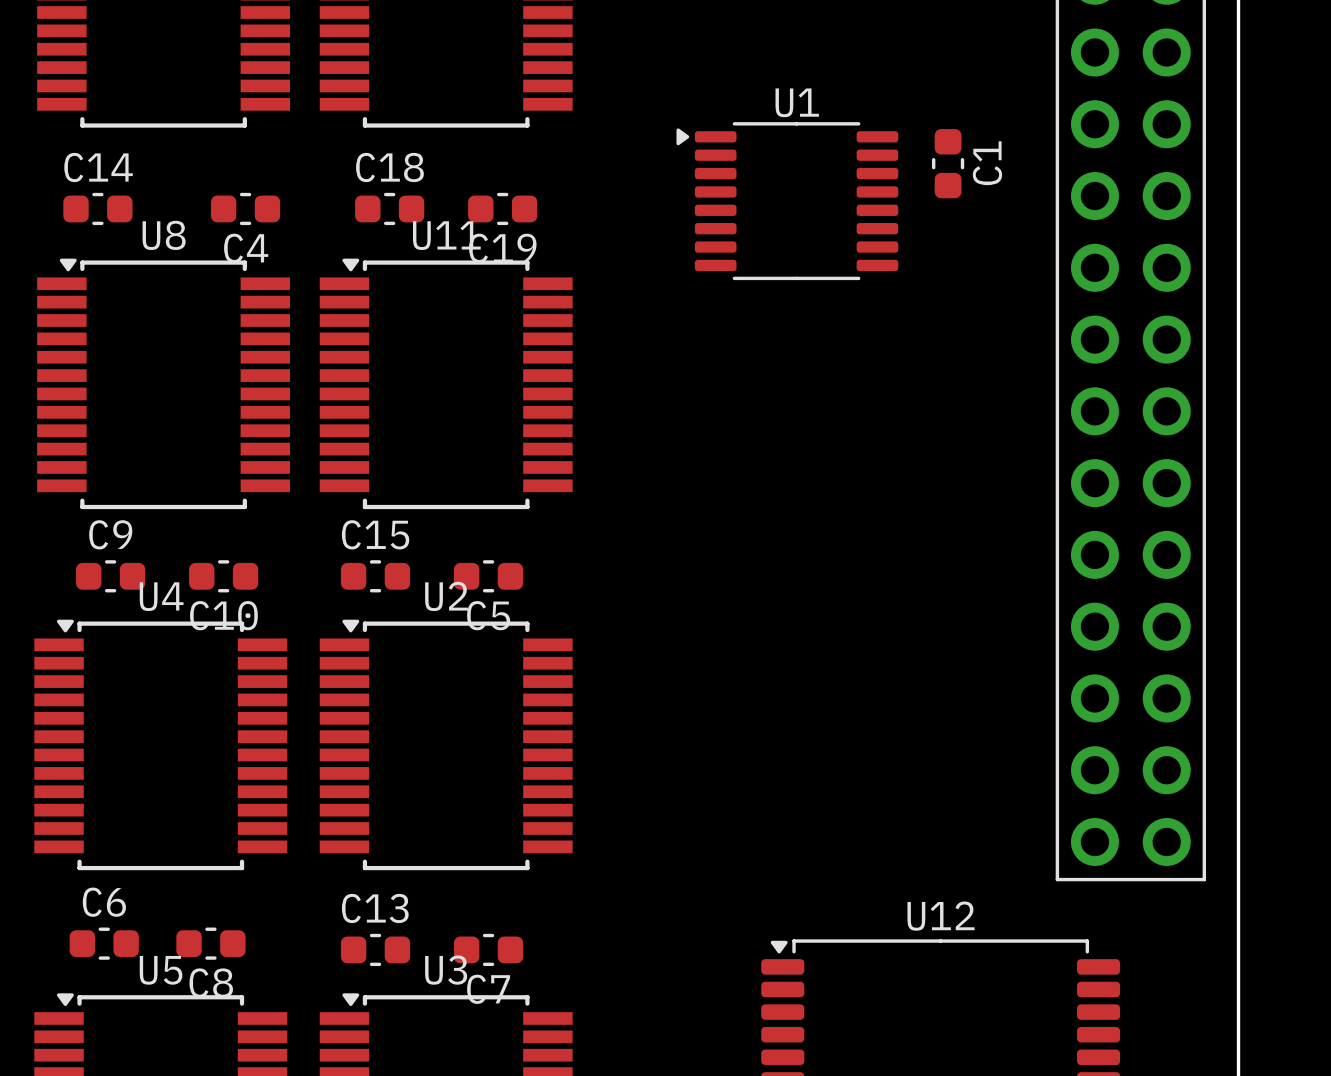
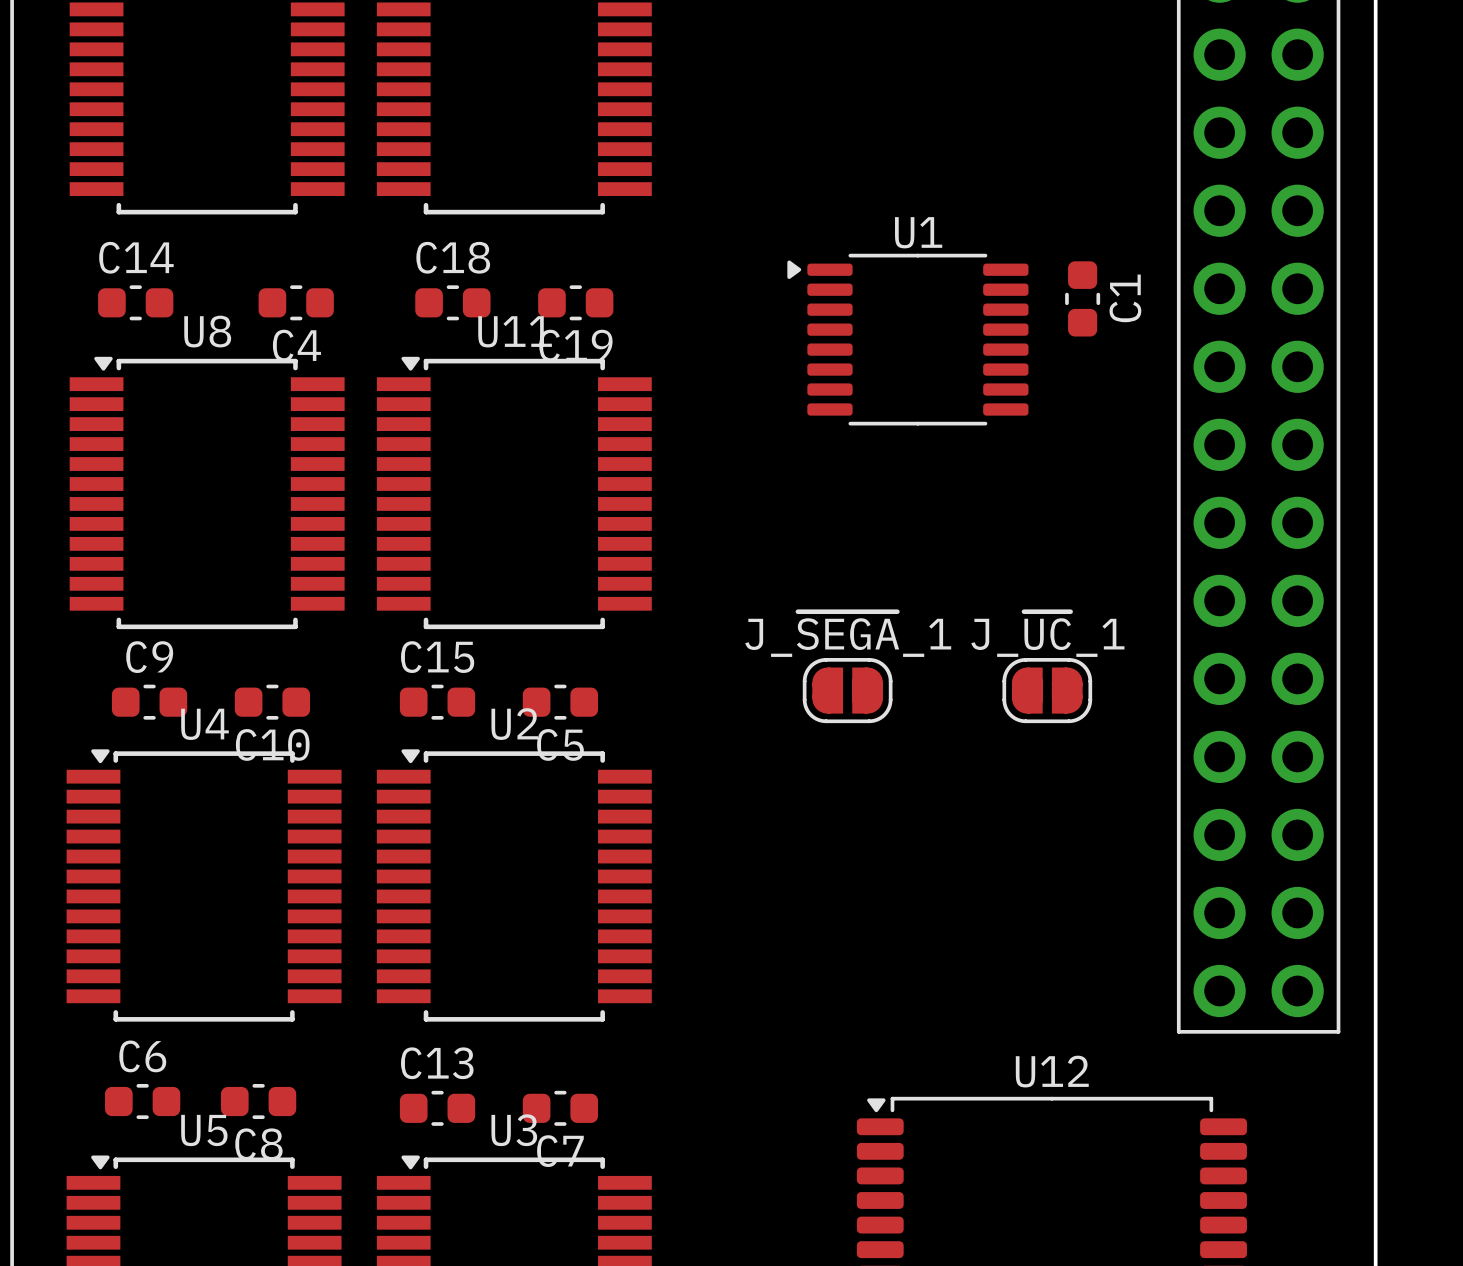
C1 position: (948, 163) -> (1082, 298)
U1 position: (787, 201) -> (907, 339)
J_~{SEGA}_1: none -> (847, 690)
J_~{UC}_1: none -> (1047, 690)

